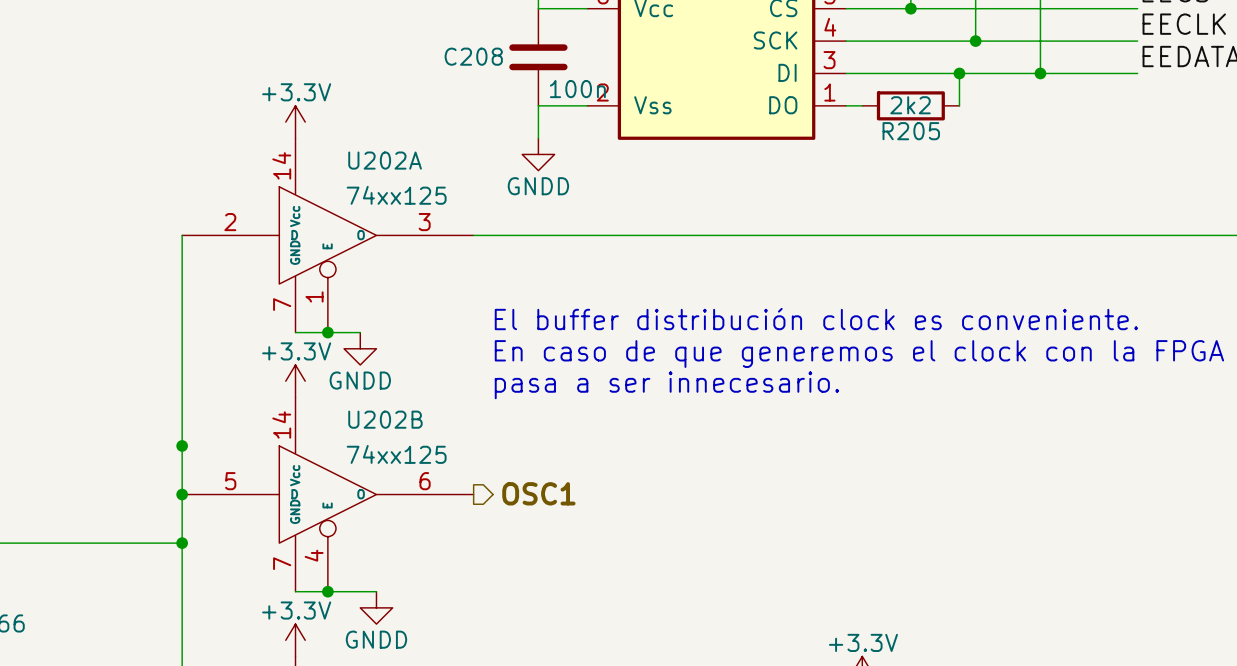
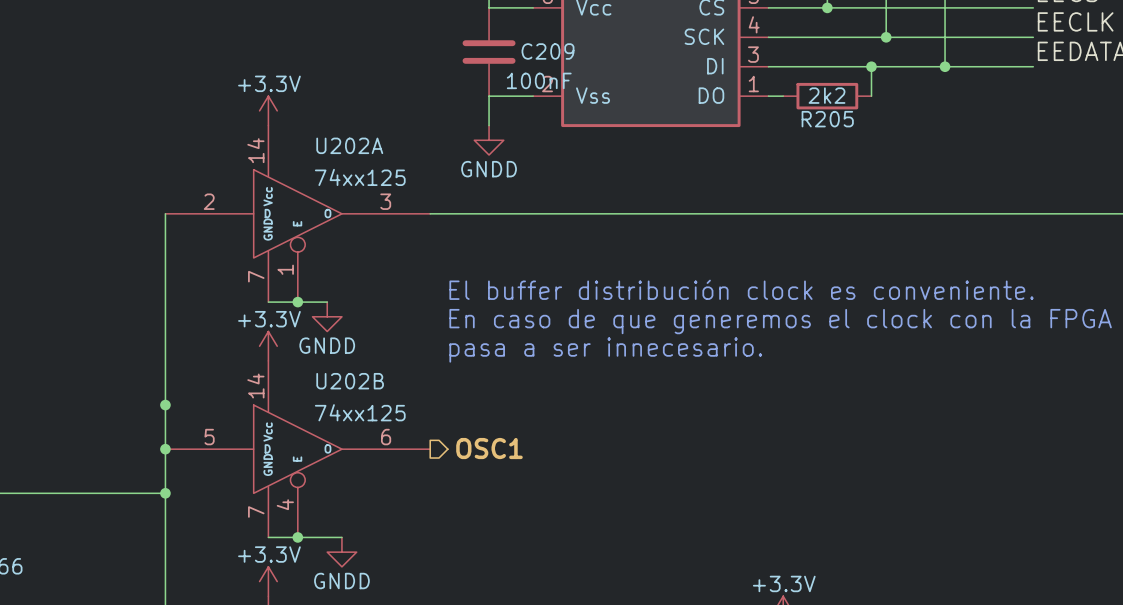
C208 name: C208 (473, 56) -> C209 (547, 51)
C208 value: 100n (577, 89) -> 100nF (539, 80)

